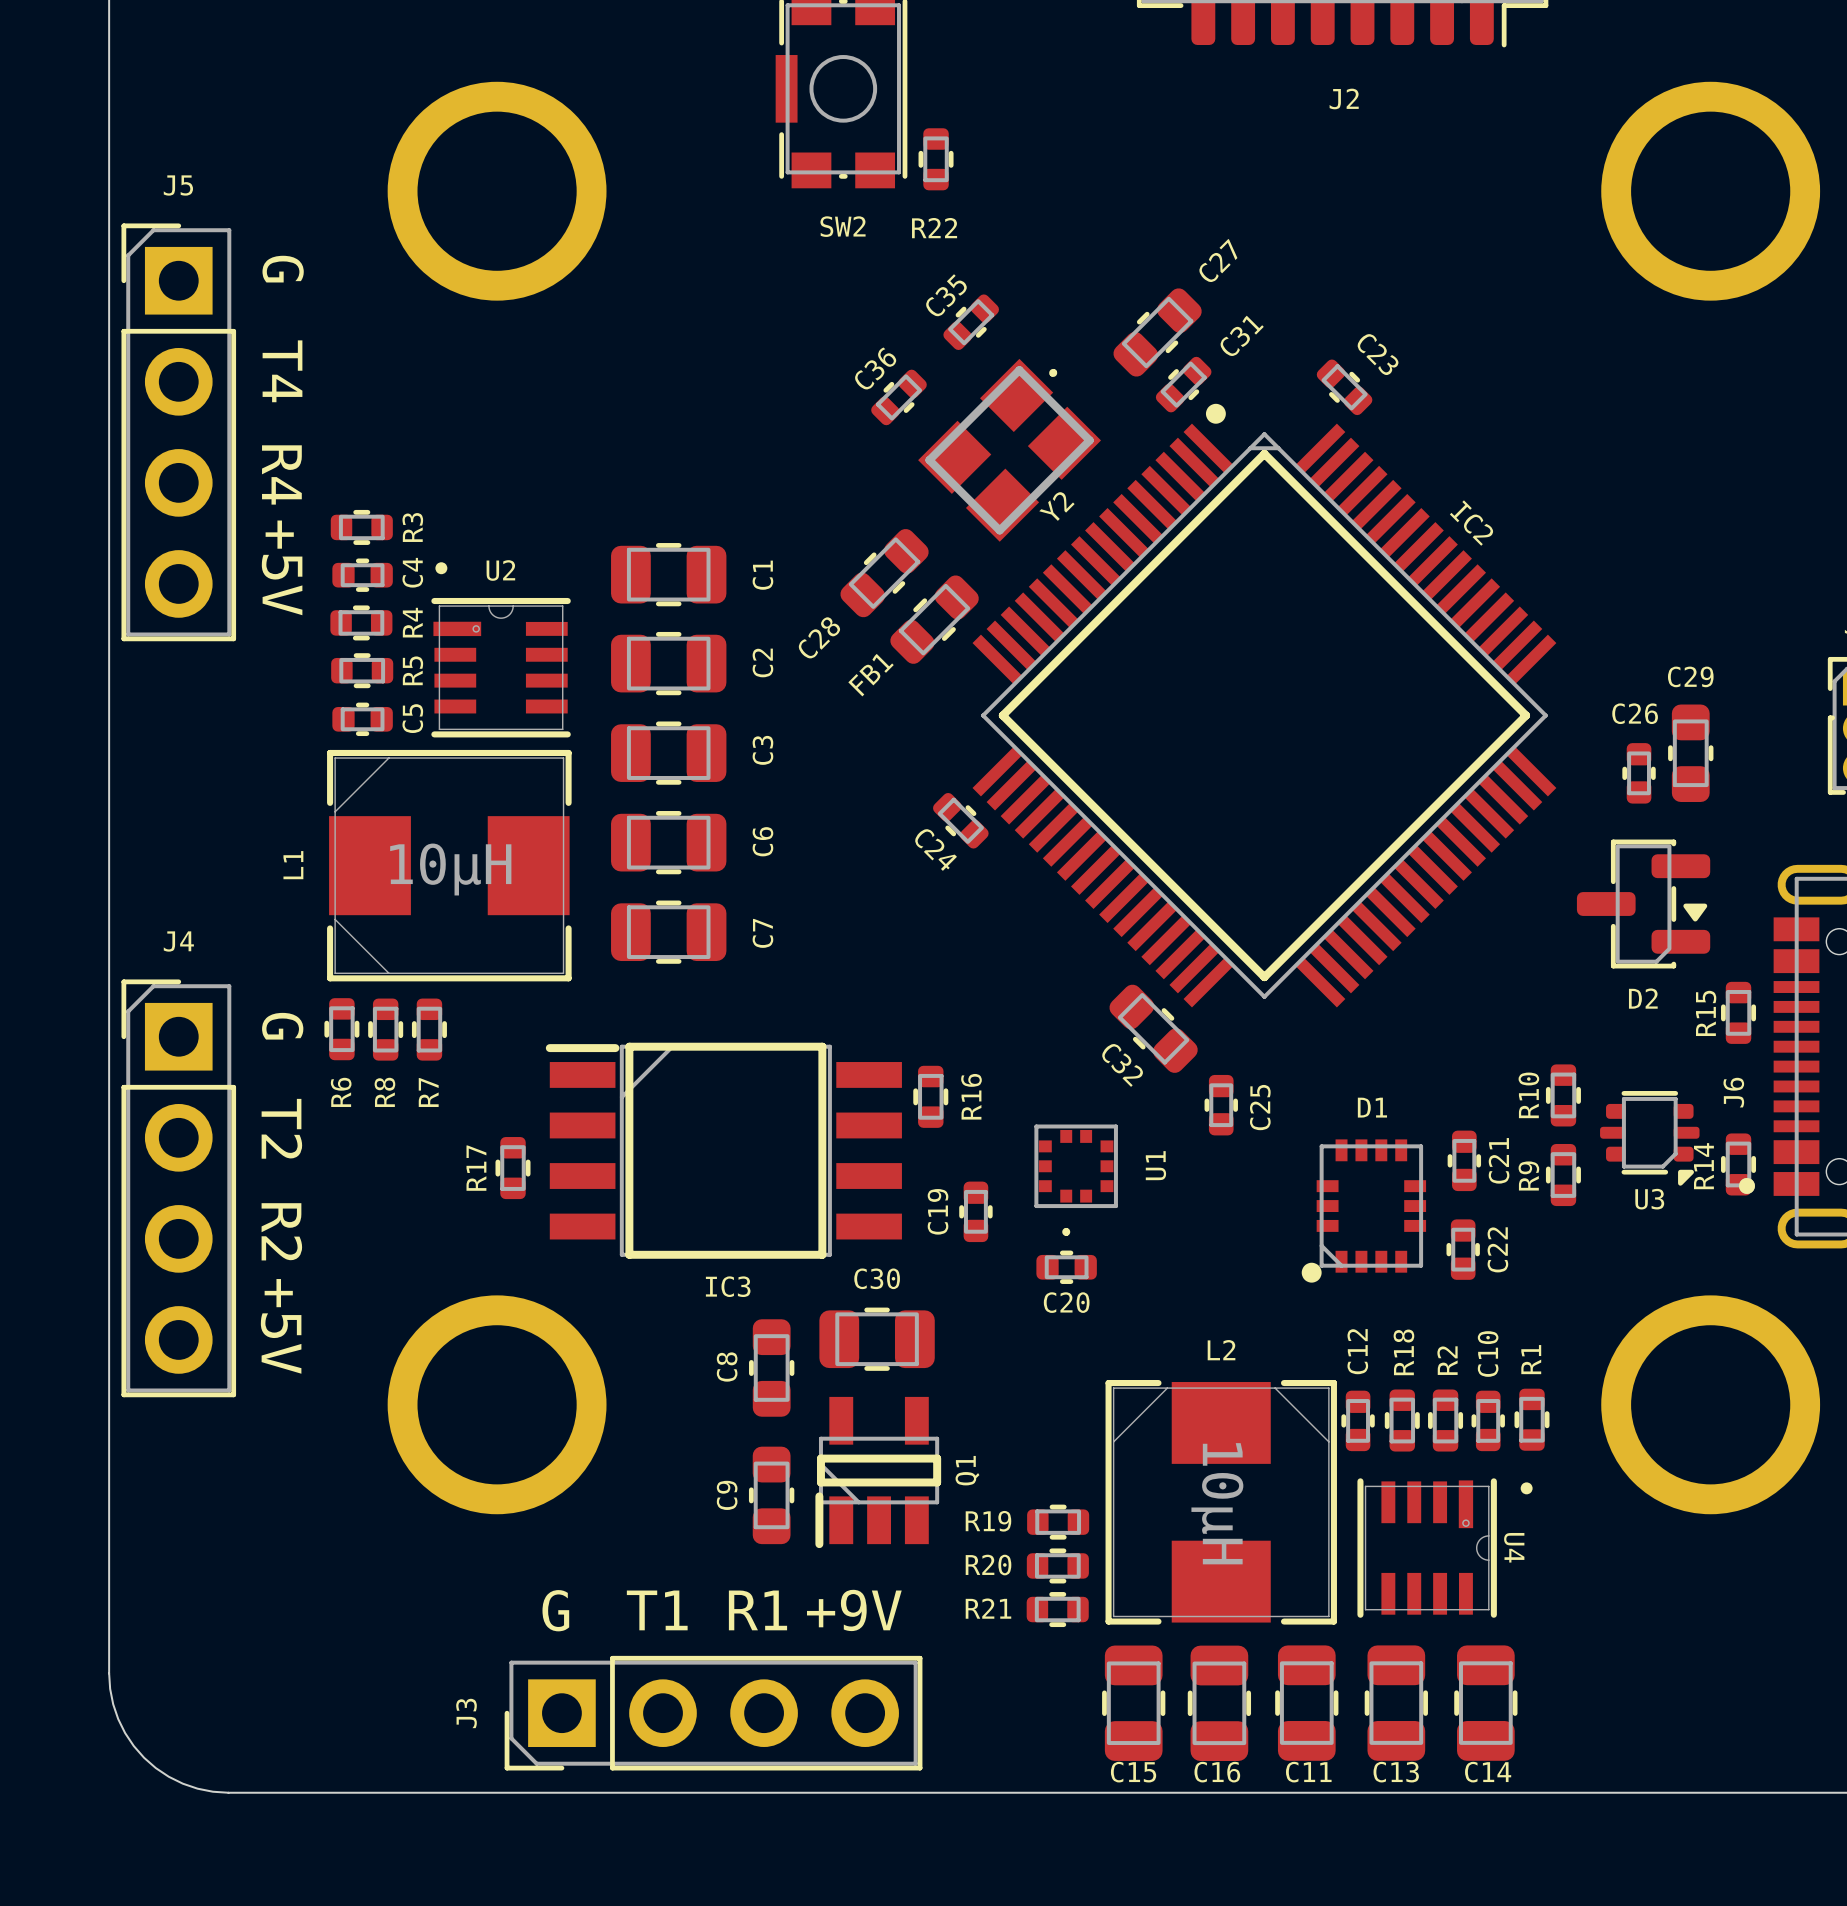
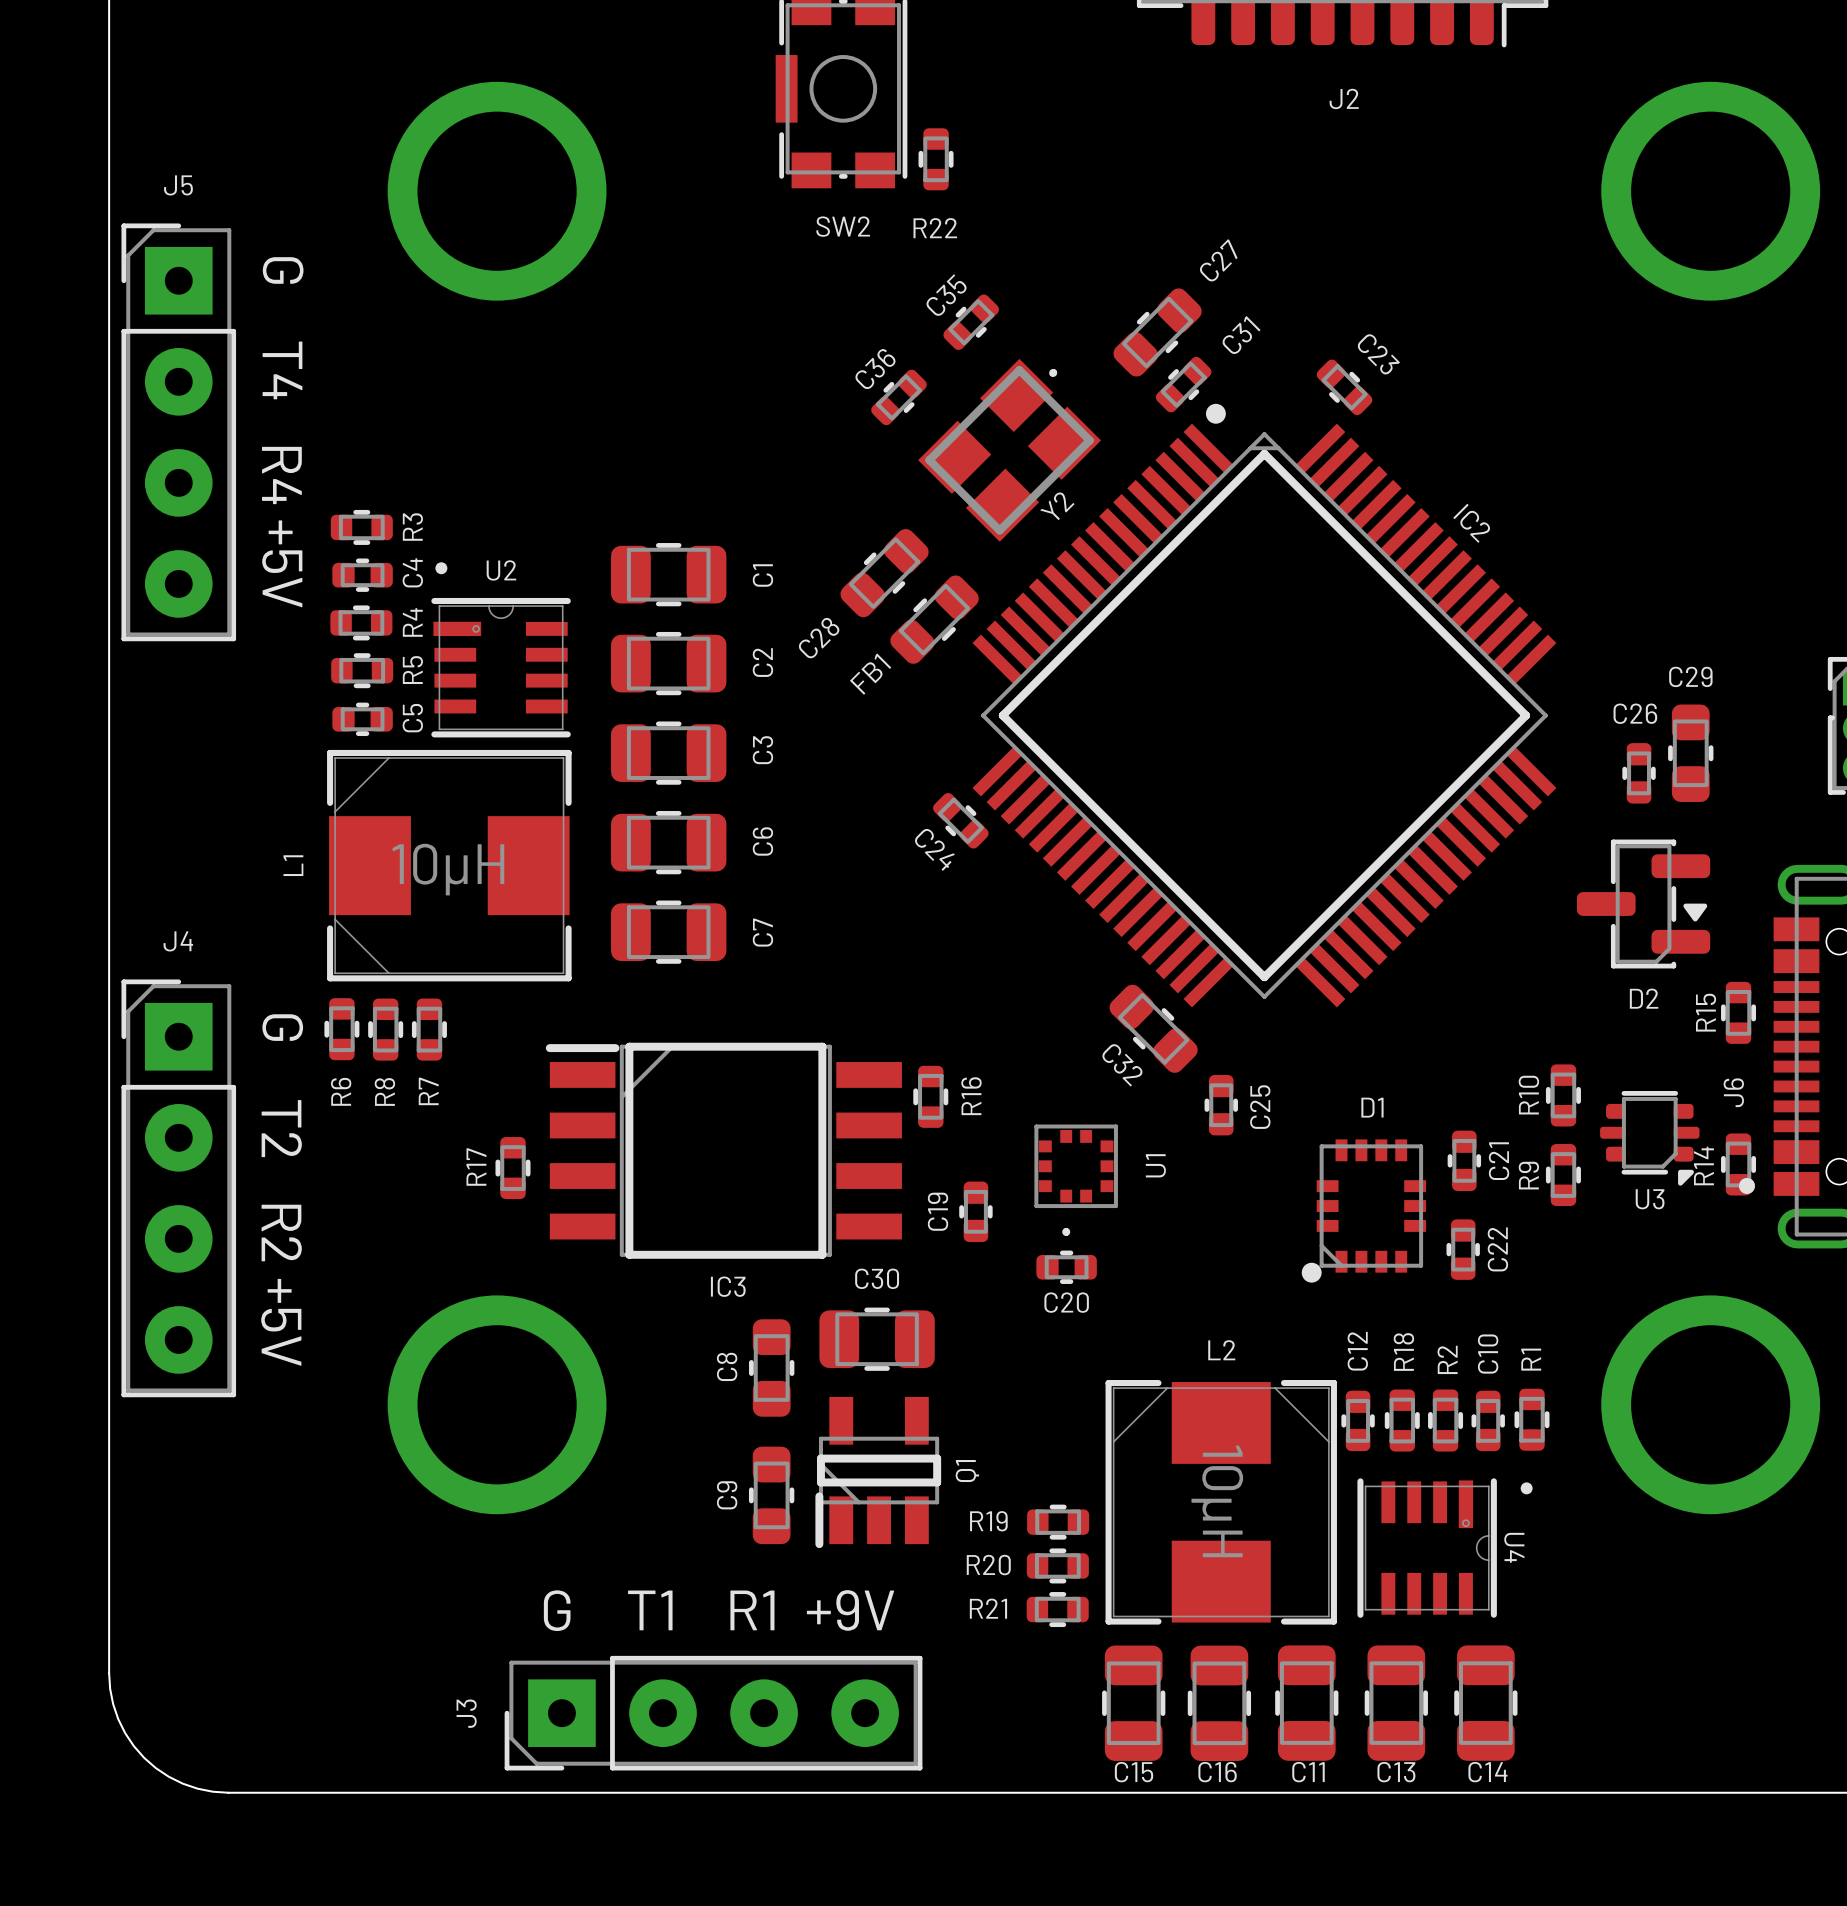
J5 footprint: [121, 223, 237, 642] -> [121, 223, 237, 642]
J4 footprint: [121, 979, 237, 1398] -> [121, 979, 237, 1398]
J3 footprint: [504, 1655, 923, 1771] -> [504, 1655, 923, 1771]

